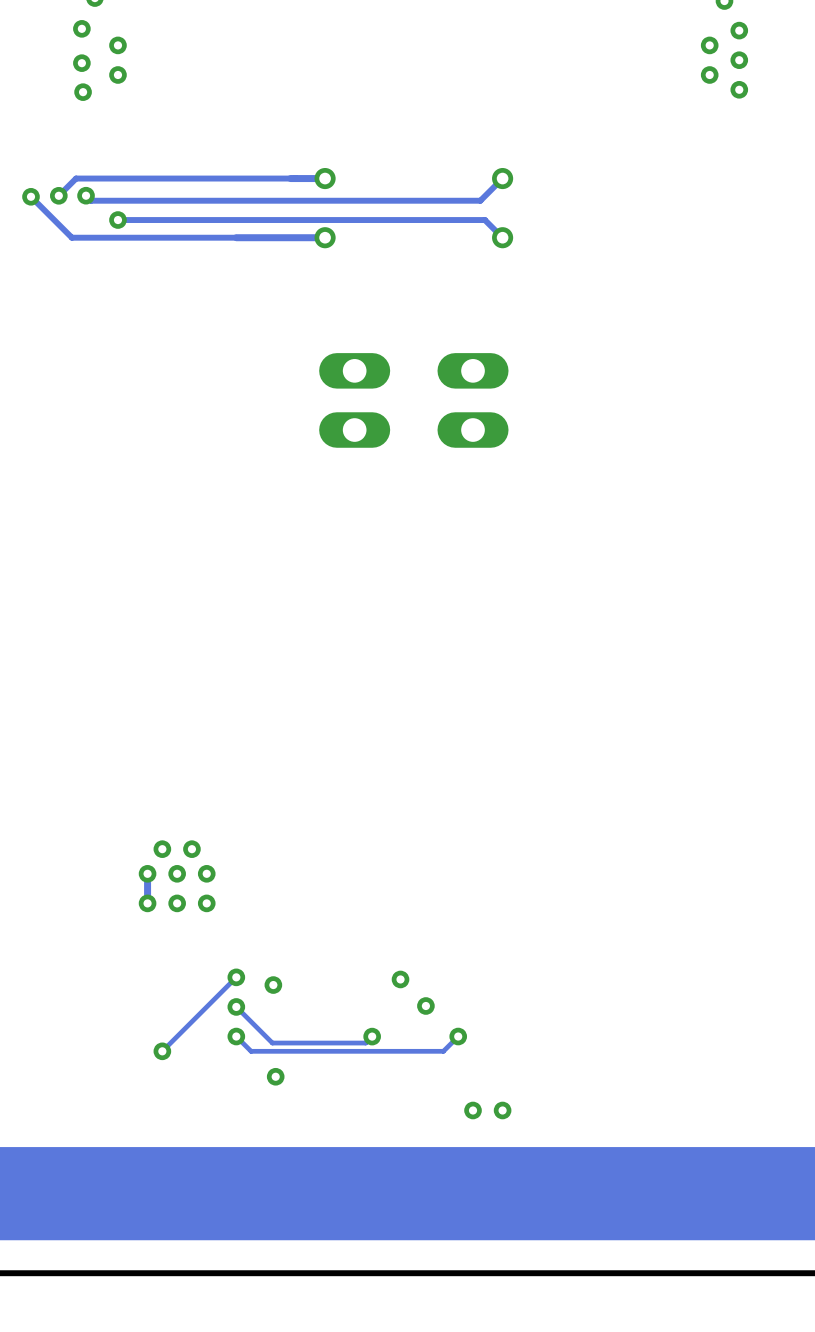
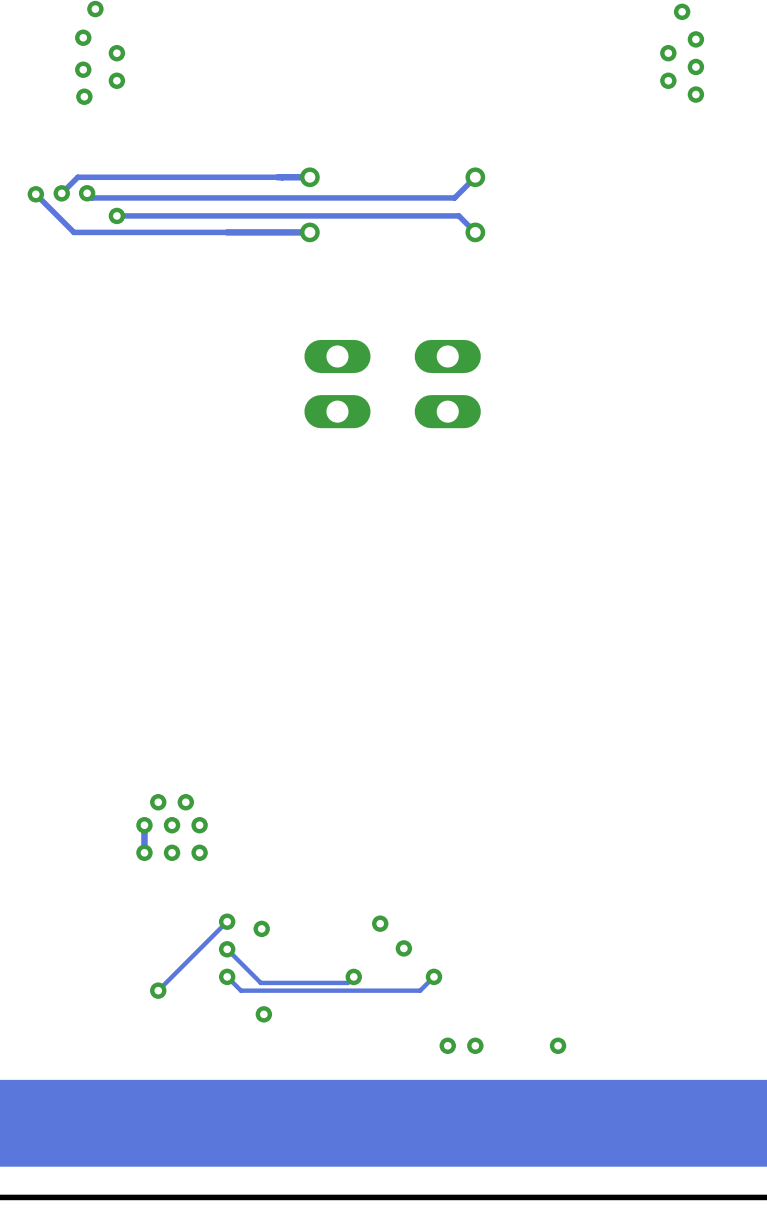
via: none -> (558, 1045)

